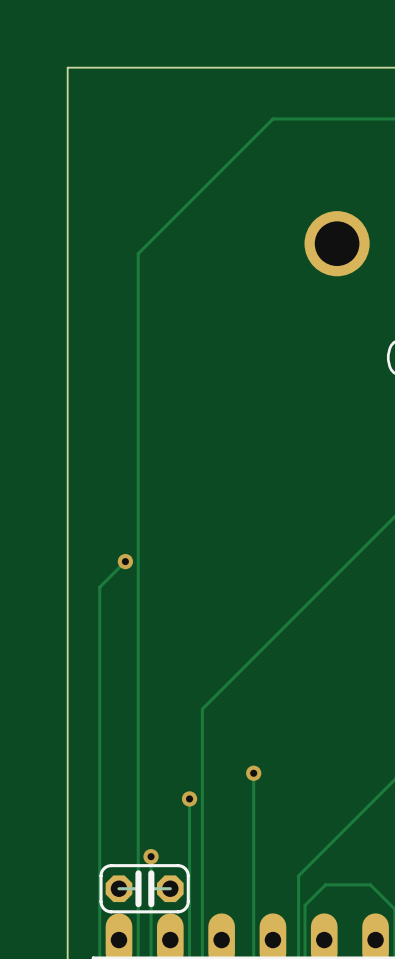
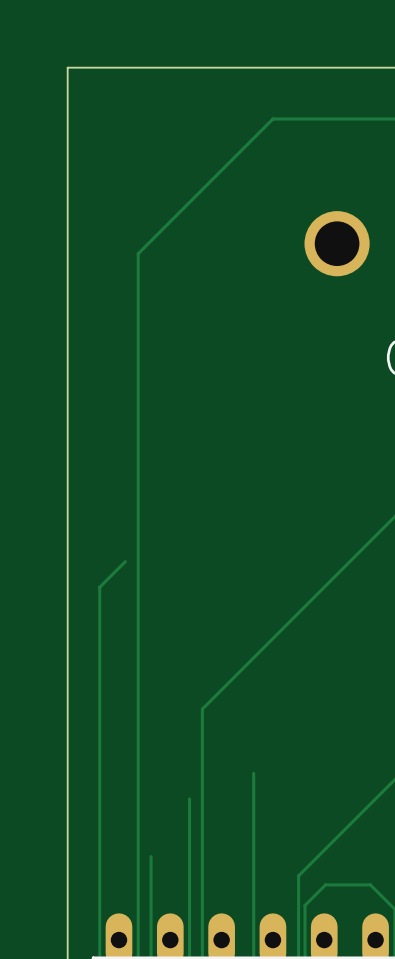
via: (125, 561) -> none
via: (253, 773) -> none
via: (189, 798) -> none
via: (151, 856) -> none
part: (144, 888) -> none

